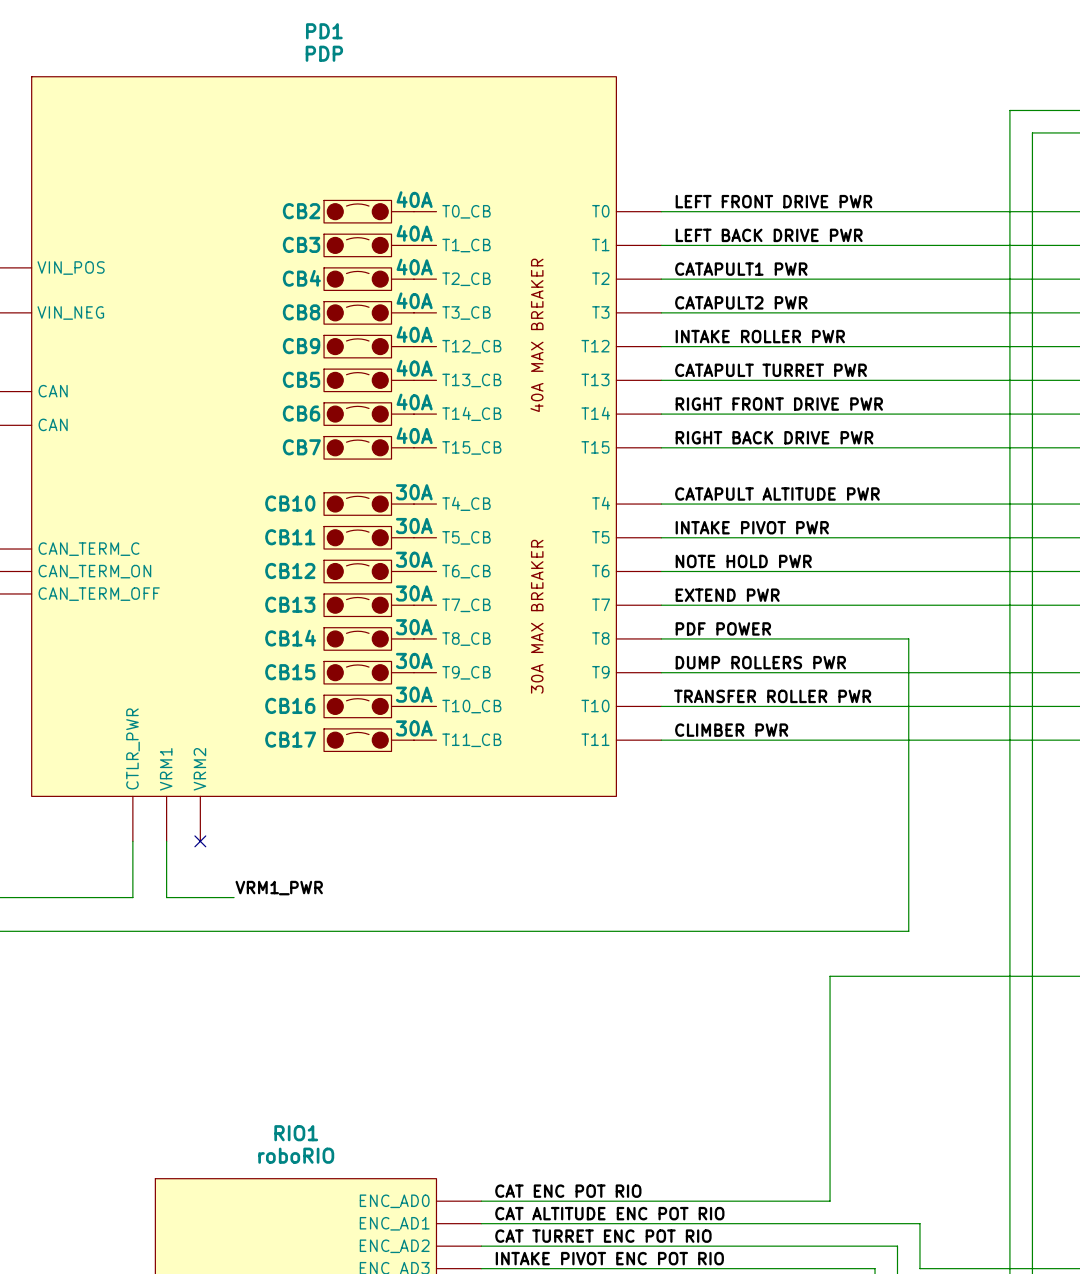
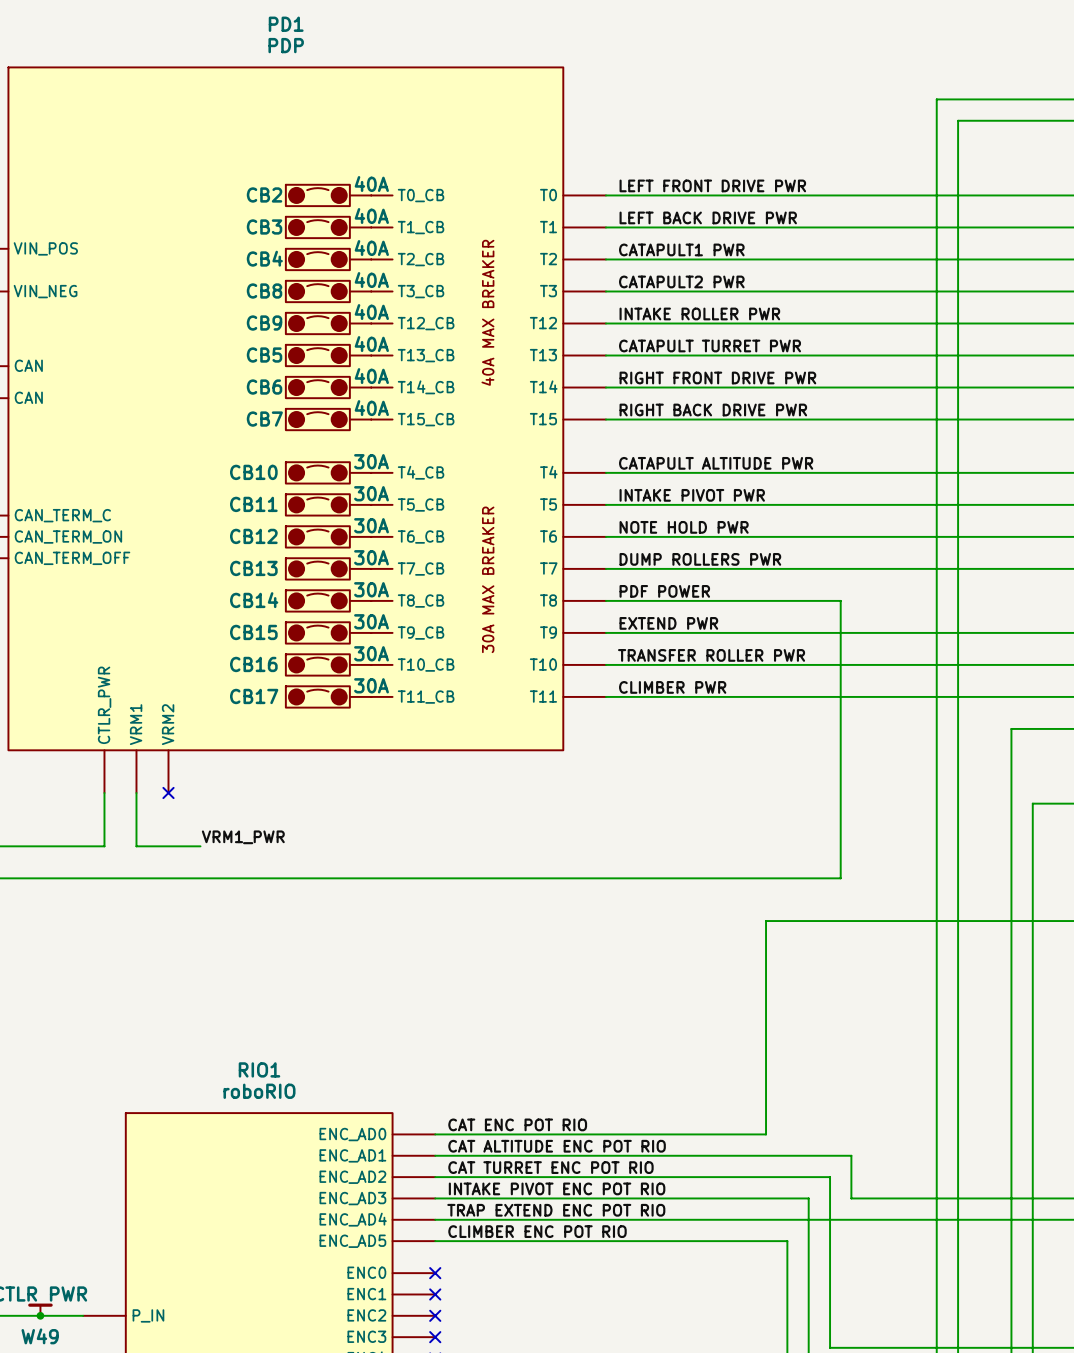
label: EXTEND PWR (727, 595) -> DUMP ROLLERS PWR (700, 559)
label: DUMP ROLLERS PWR (760, 662) -> EXTEND PWR (668, 623)

